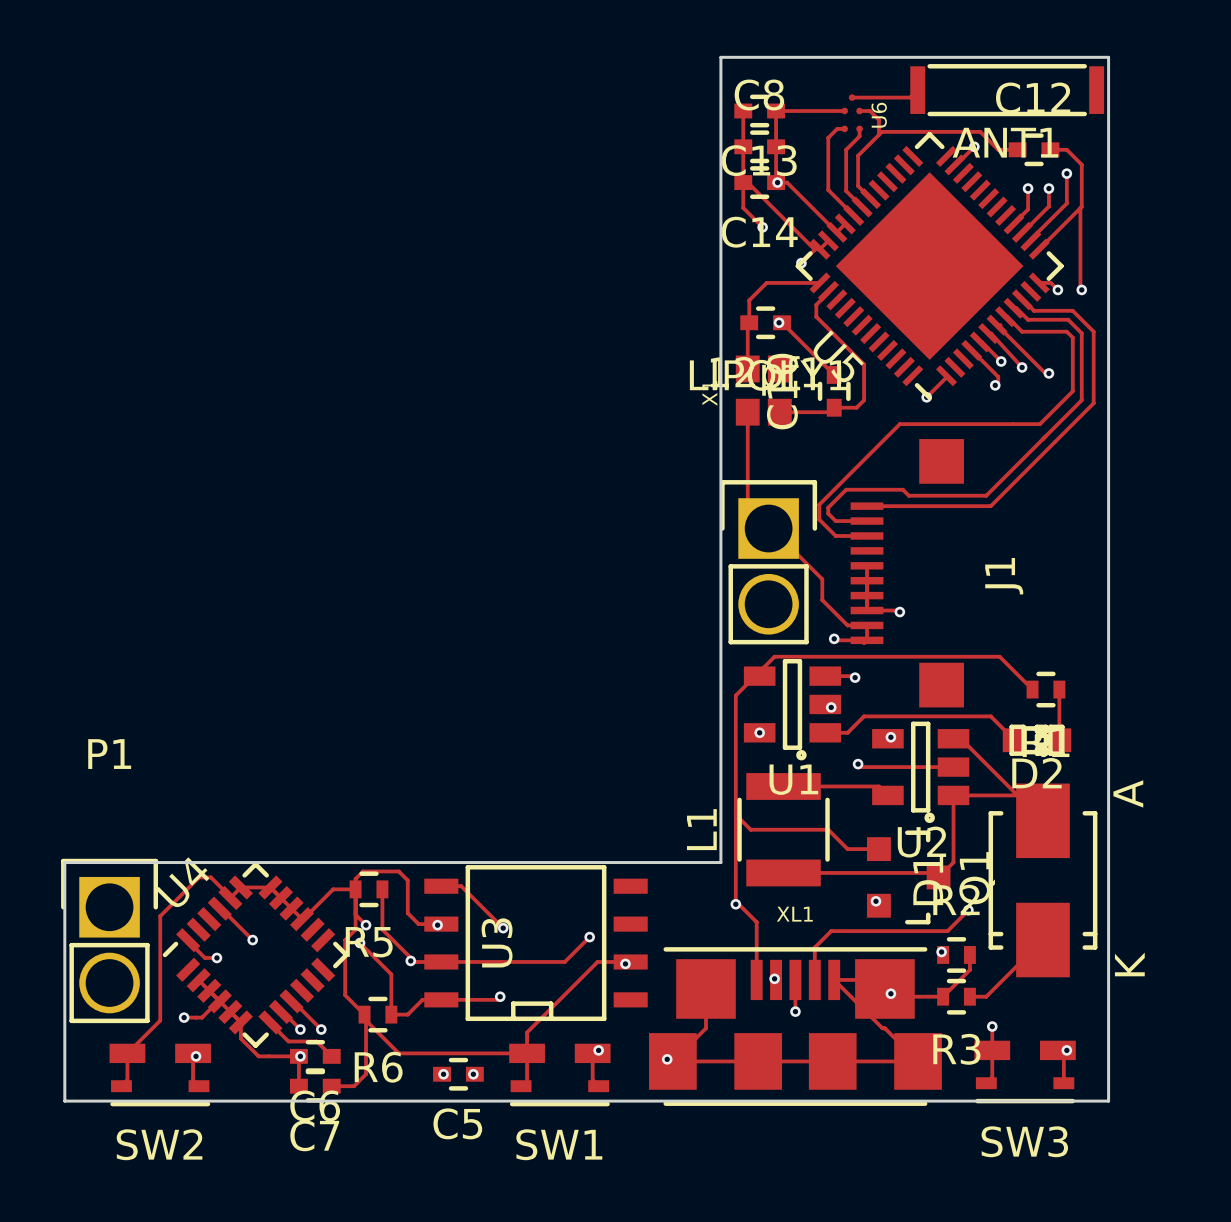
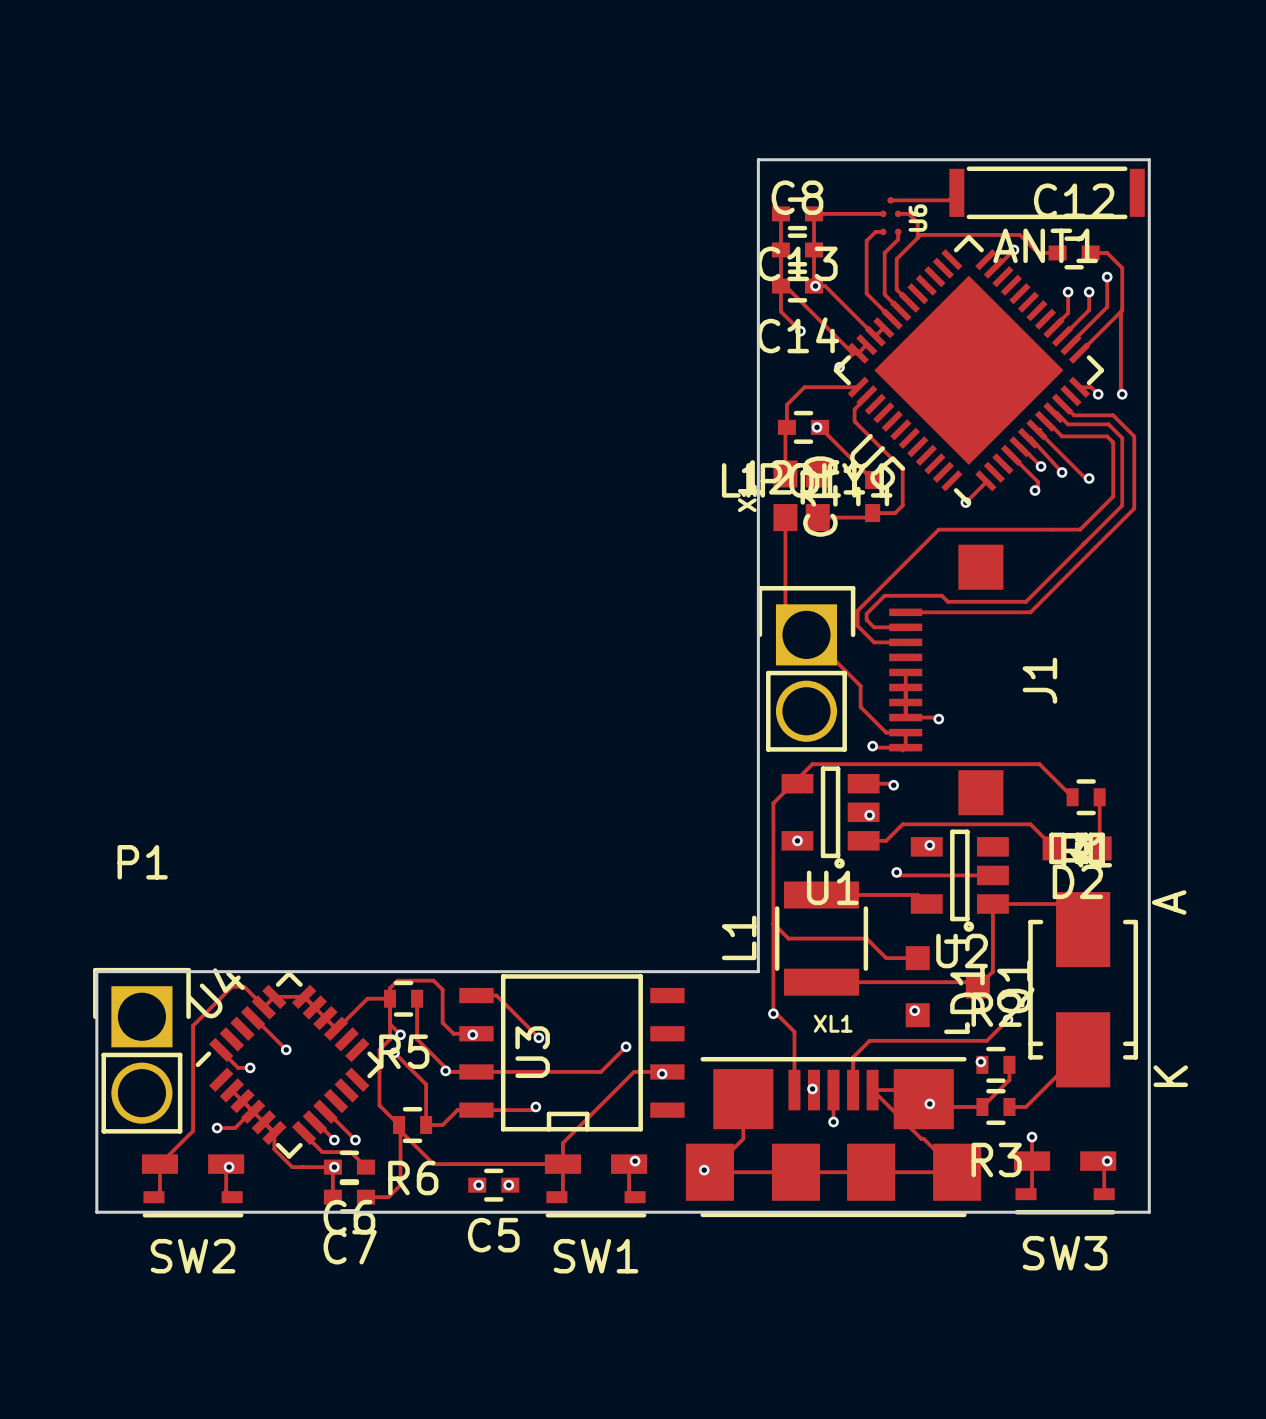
track: (953, 738) (960, 738) (1017, 795) -> none

